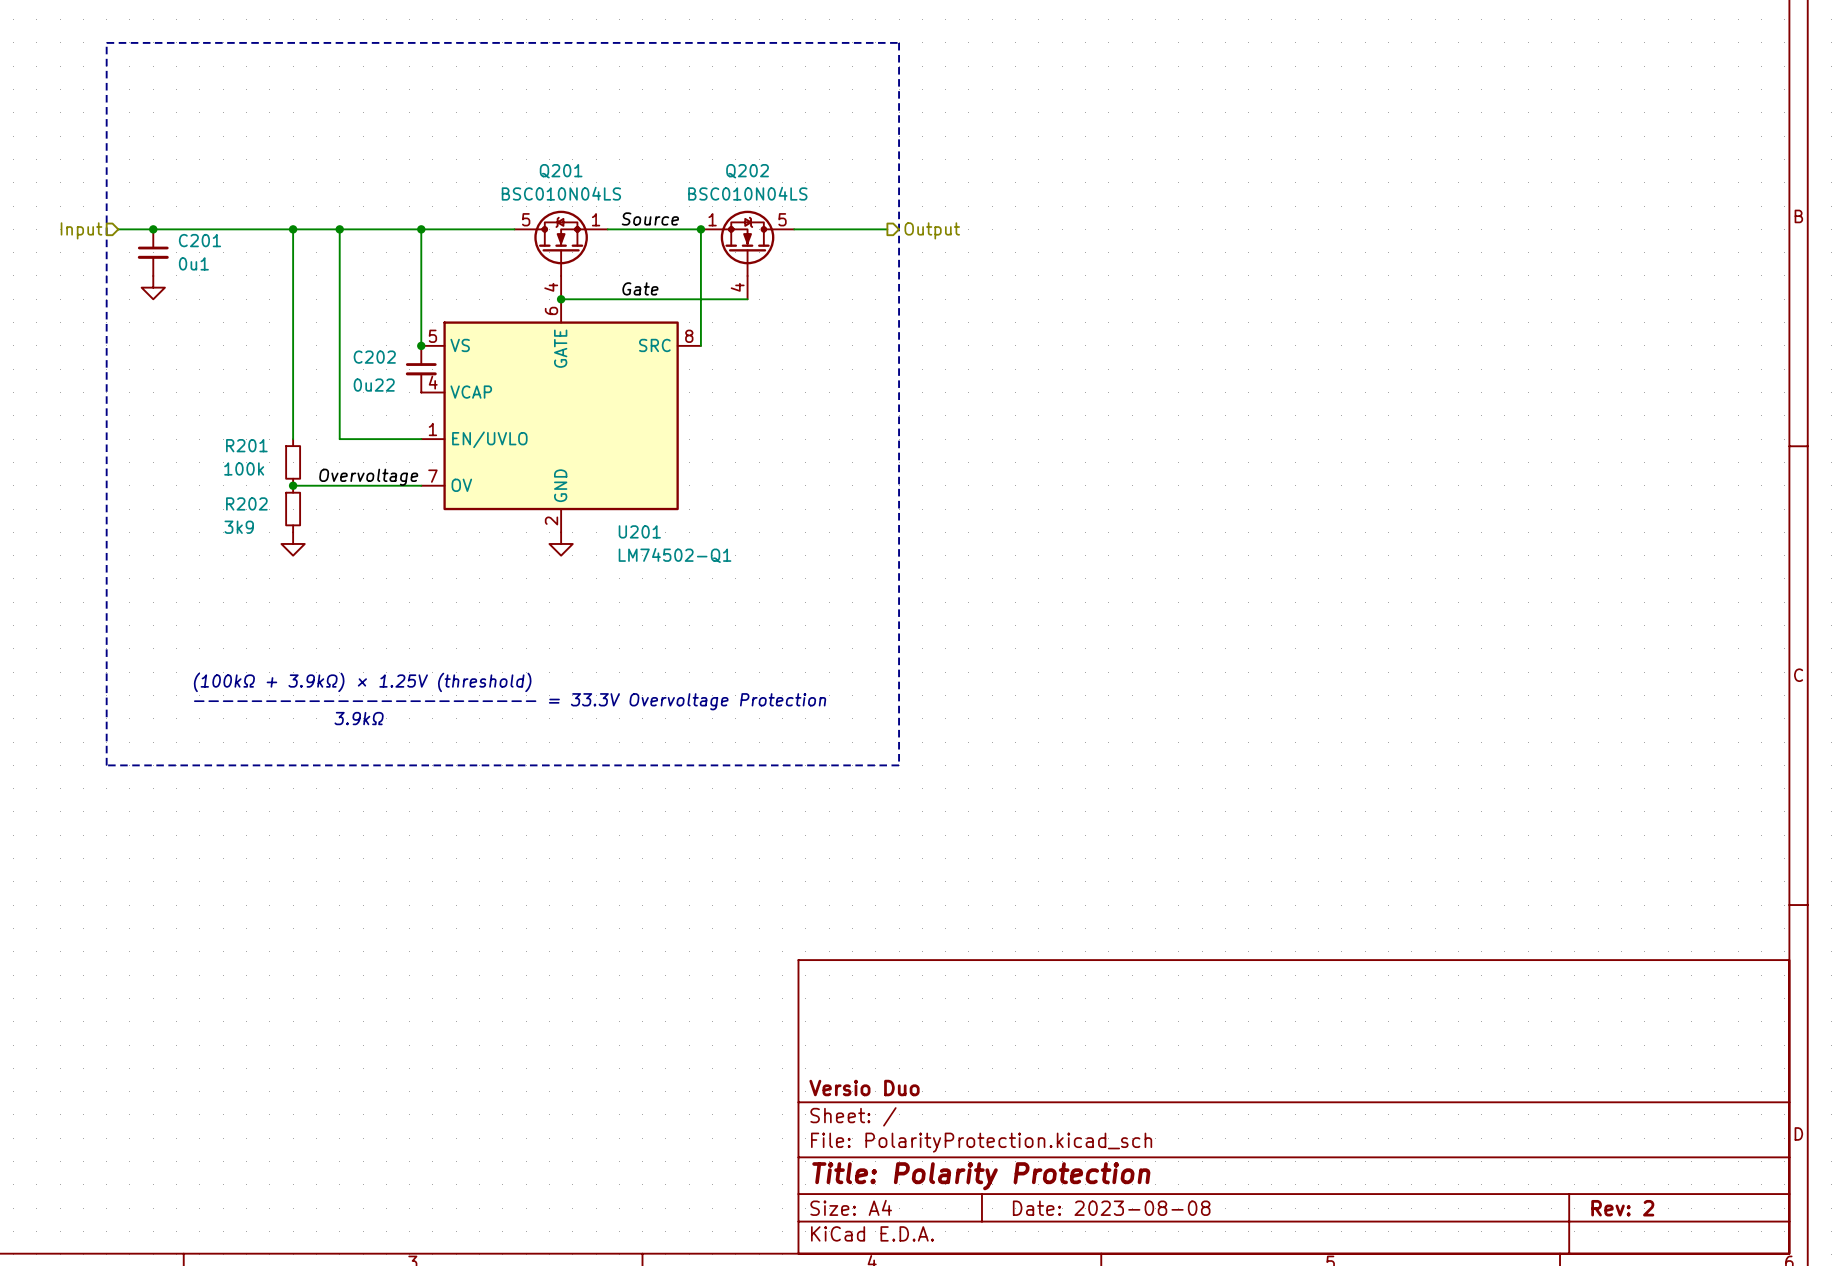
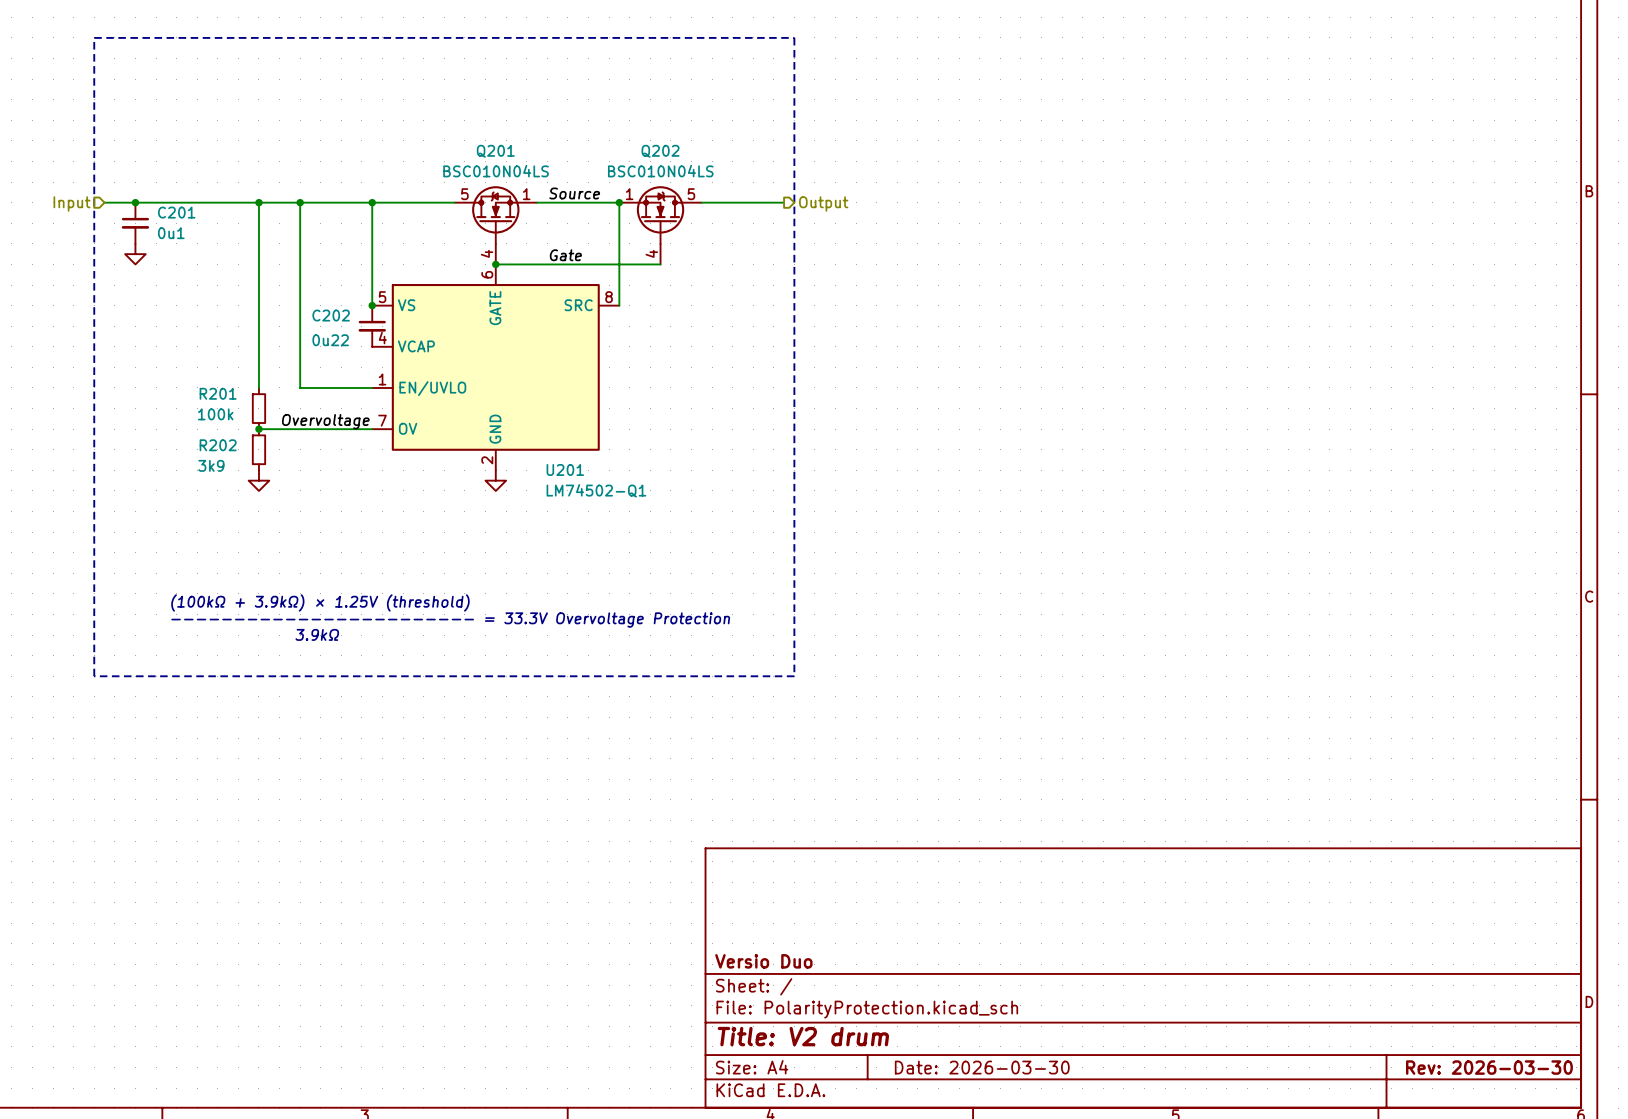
title block: Title: Polarity Protection (981, 1176) -> Title: V2 drum (803, 1036)
title block: Date: 2023-08-08 (1111, 1208) -> Date: 2026-03-30 (982, 1067)
title block: Rev: 2 (1622, 1208) -> Rev: 2026-03-30 (1489, 1067)

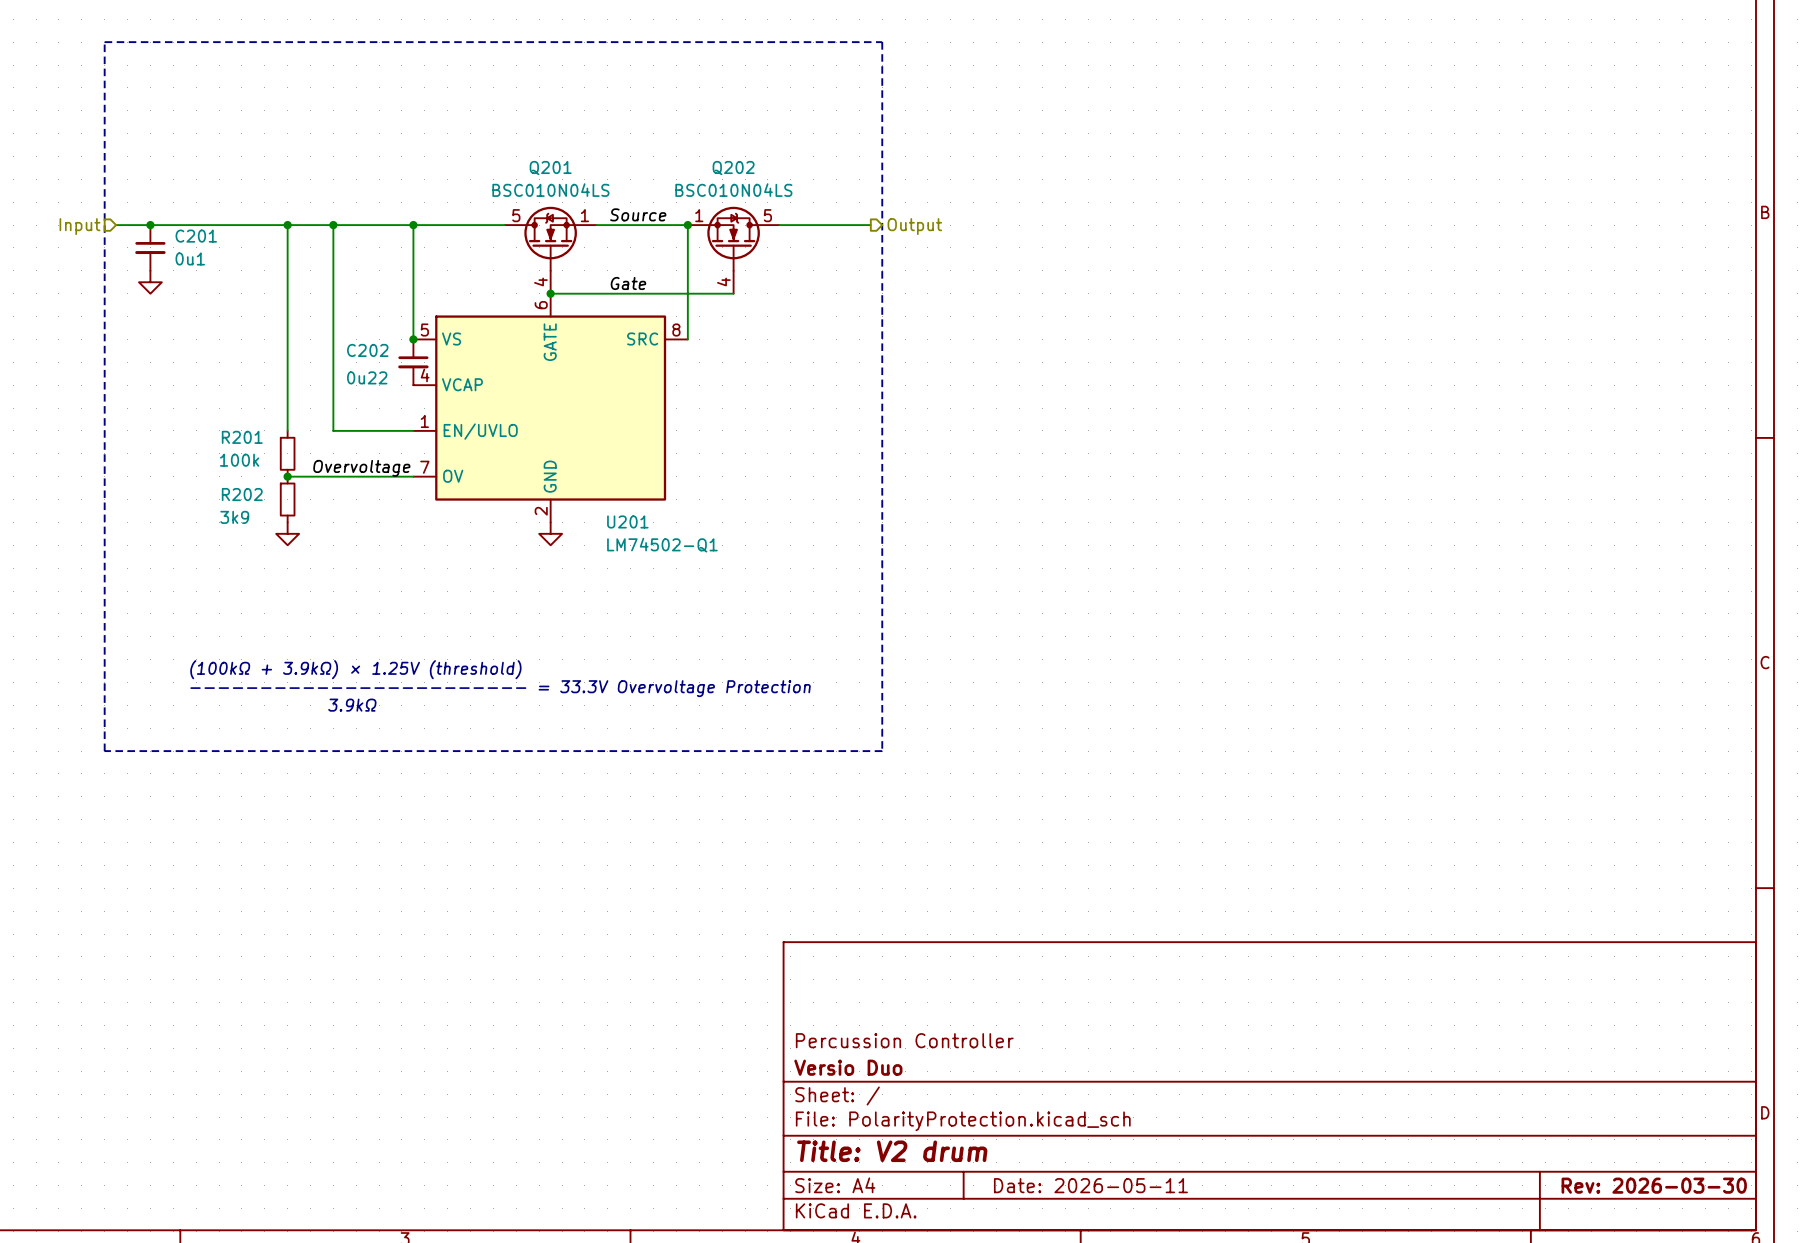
title block: none -> Percussion Controller (904, 1040)
title block: Date: 2026-03-30 (982, 1067) -> Date: 2026-05-11 (1090, 1185)

